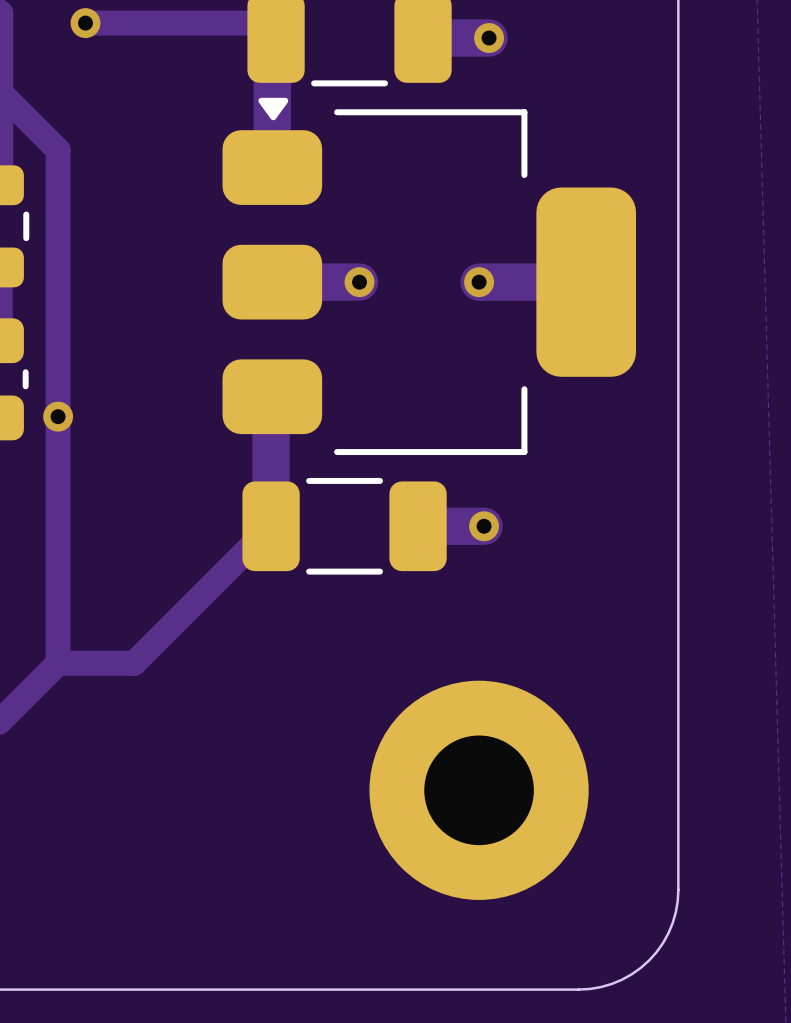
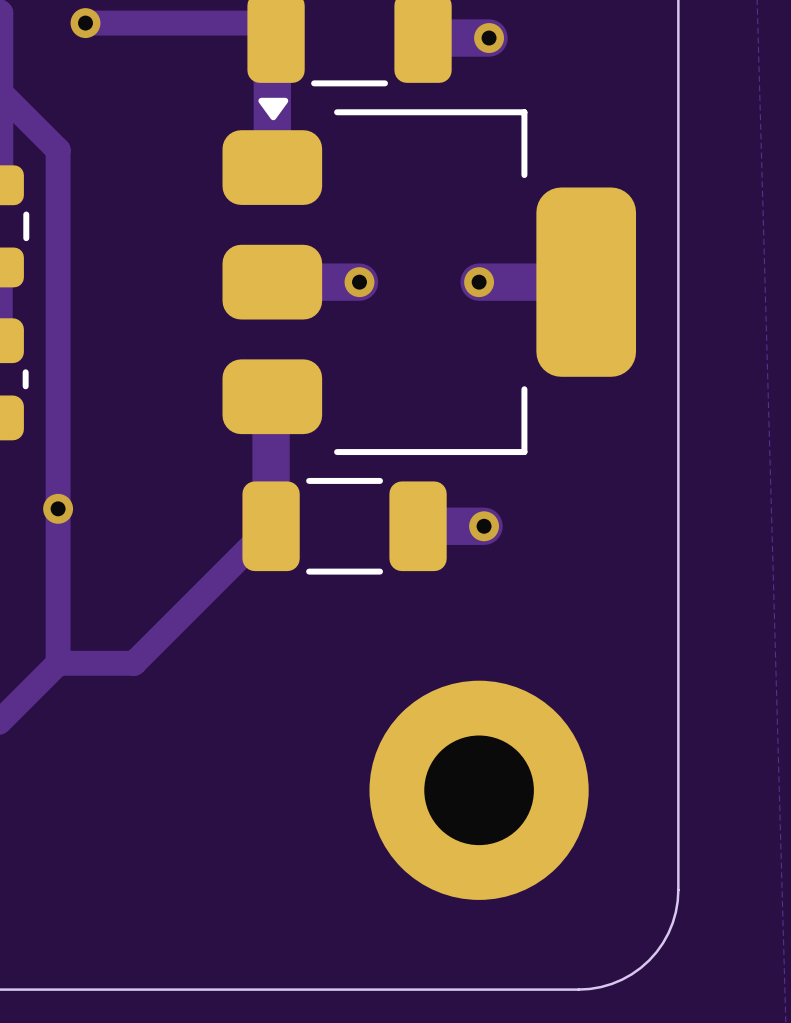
via position: (58, 416) -> (58, 508)

